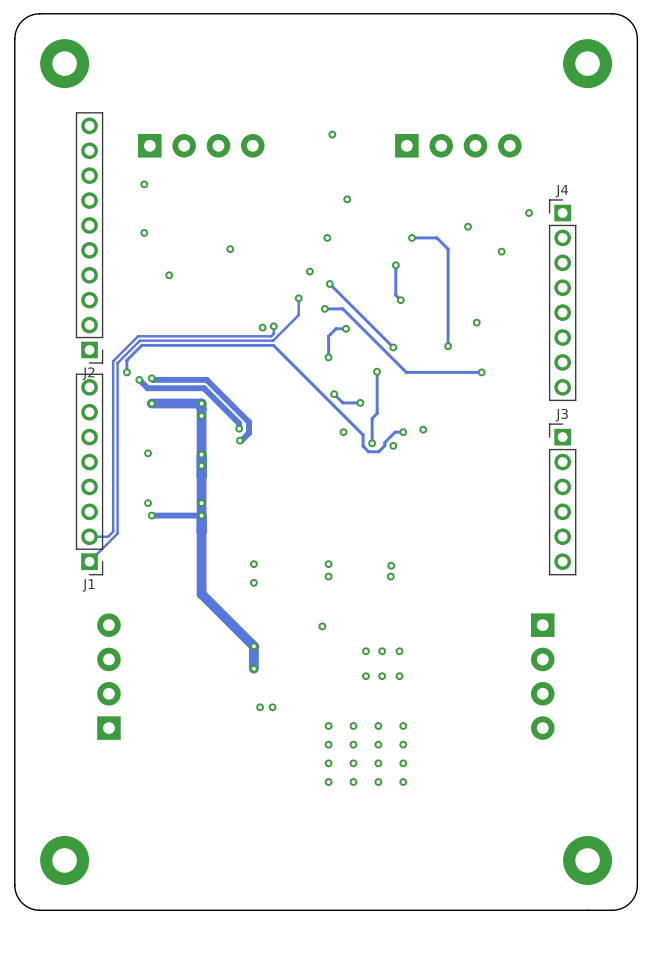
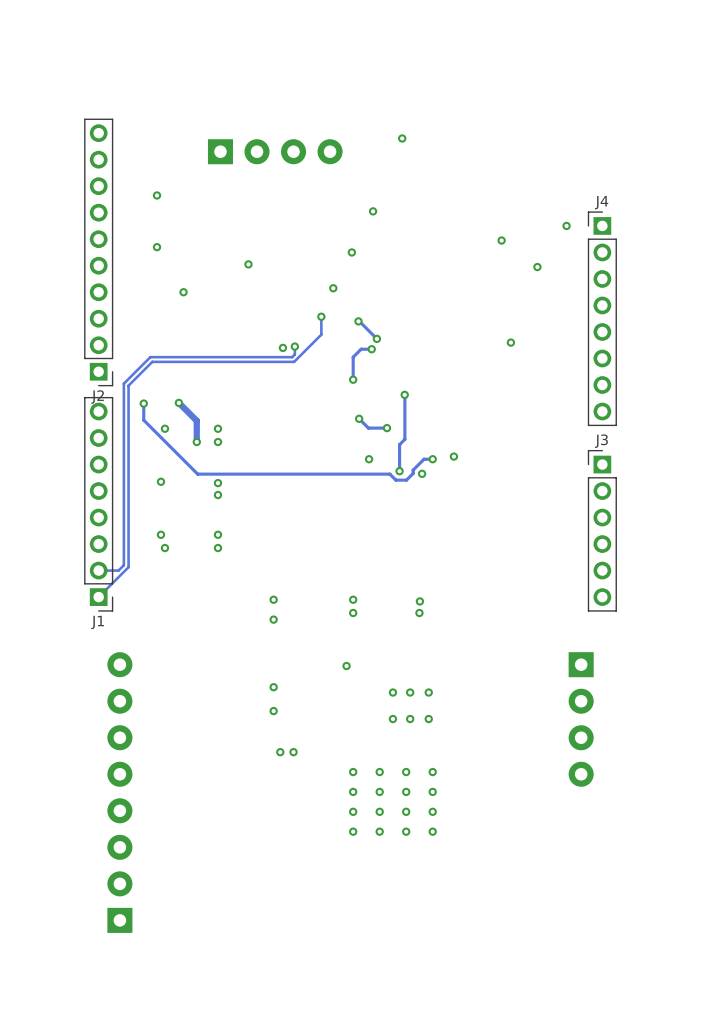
board edge: (612, 13) (39, 13) (27, 17) (18, 26) (14, 38) (14, 885) (18, 897) (27, 906) (39, 910) (612, 910) (624, 906) (634, 897) (637, 885) (637, 38) (635, 29) (630, 21) (621, 15) (612, 13) -> none
part: (64, 63) -> none
part: (587, 63) -> none
via position: (332, 134) -> (402, 138)
part position: (201, 145) -> (275, 151)
part: (458, 145) -> none
track: (412, 237) (436, 237) (448, 249) (448, 346) -> none
via: (412, 237) -> none
track: (395, 265) (395, 295) (400, 300) -> none
via: (395, 265) -> none
track: (329, 283) (393, 347) -> none
via: (329, 283) -> none
via: (400, 300) -> none
track: none -> (358, 321) (376, 338)
via: none -> (358, 321)
track: (324, 308) (342, 308) (406, 372) (481, 372) -> none
via: (324, 308) -> none
via: none -> (376, 338)
via: (448, 346) -> none
via: (393, 347) -> none
track: (126, 372) (126, 360) (141, 345) (273, 345) (363, 434) (363, 446) -> (143, 403) (143, 420) (197, 474) (389, 474)
via: (126, 372) -> none
via: (481, 372) -> none
track: (151, 378) (206, 379) (249, 422) (249, 432) (239, 440) -> none
via: (151, 378) -> none
via: none -> (143, 403)
track: (139, 379) (147, 388) (203, 388) (239, 423) (239, 428) -> none
via: (139, 379) -> none
track: none -> (178, 402) (196, 420) (196, 442)
via: none -> (178, 402)
track: (151, 403) (201, 403) (201, 594) (253, 646) (253, 668) -> none
via: none -> (196, 442)
via: (239, 428) -> none
via: (239, 440) -> none
track: (201, 515) (151, 515) -> none
part: (108, 676) -> none
part: none -> (119, 792)
part: (64, 860) -> none
part: (587, 860) -> none

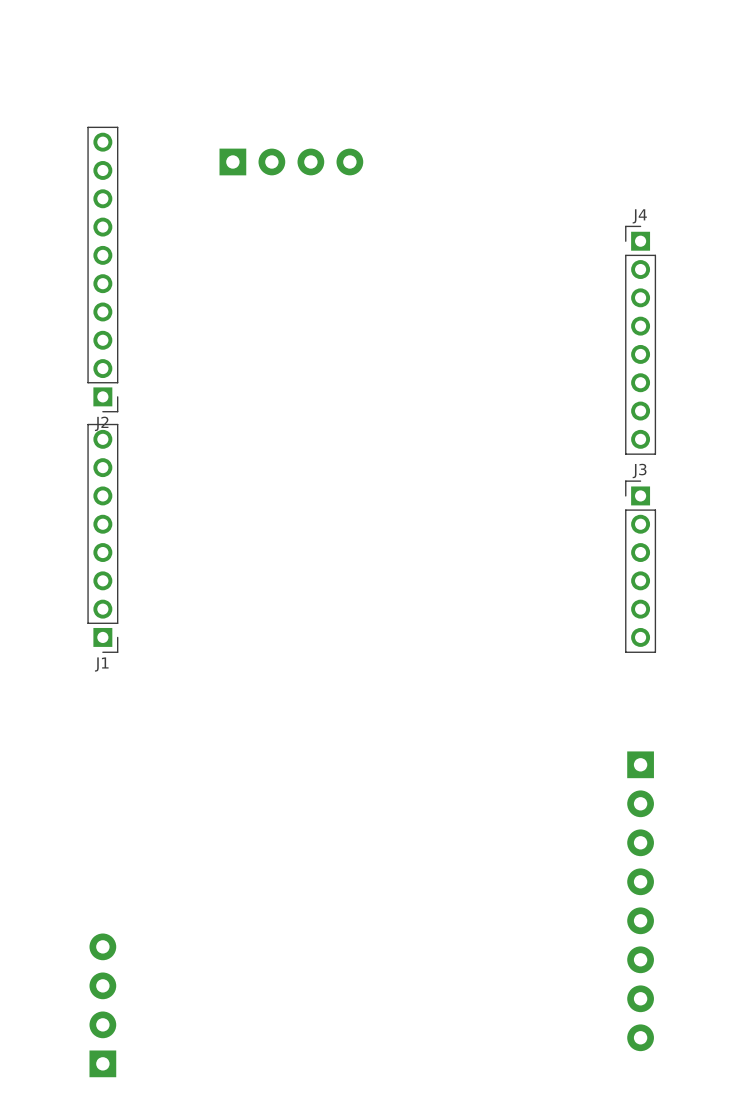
via: (402, 138) -> none
via: (157, 195) -> none
via: (373, 211) -> none
via: (566, 225) -> none
via: (501, 240) -> none
via: (157, 247) -> none
via: (351, 252) -> none
via: (248, 264) -> none
via: (537, 267) -> none
via: (333, 288) -> none
via: (183, 292) -> none
track: (321, 316) (321, 334) (294, 361) (152, 361) (128, 385) (128, 567) (98, 597) -> none
via: (321, 316) -> none
track: (358, 321) (376, 338) -> none
via: (358, 321) -> none
via: (376, 338) -> none
via: (510, 342) -> none
track: (294, 346) (294, 354) (292, 357) (150, 357) (123, 383) (123, 565) (118, 570) (98, 570) -> none
via: (294, 346) -> none
via: (282, 347) -> none
track: (371, 349) (361, 349) (353, 357) (353, 379) -> none
via: (371, 349) -> none
via: (353, 379) -> none
track: (404, 394) (404, 439) (399, 444) (399, 471) -> none
via: (404, 394) -> none
track: (178, 402) (196, 420) (196, 442) -> none
via: (178, 402) -> none
track: (143, 403) (143, 420) (197, 474) (389, 474) (395, 480) (406, 480) (424, 459) (432, 459) -> none
via: (143, 403) -> none
track: (359, 418) (368, 428) (386, 428) -> none
via: (359, 418) -> none
via: (164, 428) -> none
via: (217, 428) -> none
via: (386, 428) -> none
via: (196, 442) -> none
via: (217, 442) -> none
via: (453, 456) -> none
via: (369, 459) -> none
via: (432, 459) -> none
via: (399, 471) -> none
via: (422, 473) -> none
via: (160, 481) -> none
via: (217, 483) -> none
via: (217, 495) -> none
via: (160, 534) -> none
via: (217, 534) -> none
via: (164, 548) -> none
via: (217, 548) -> none
via: (273, 599) -> none
via: (353, 599) -> none
via: (419, 601) -> none
via: (353, 612) -> none
via: (419, 612) -> none
via: (273, 619) -> none
via: (346, 666) -> none
via: (273, 687) -> none
via: (392, 692) -> none
via: (410, 692) -> none
via: (428, 692) -> none
via: (273, 711) -> none
via: (392, 719) -> none
via: (410, 719) -> none
via: (428, 719) -> none
part: (581, 719) -> none
via: (280, 752) -> none
via: (293, 752) -> none
via: (353, 772) -> none
via: (379, 772) -> none
via: (406, 772) -> none
via: (432, 772) -> none
via: (353, 791) -> none
via: (379, 791) -> none
via: (406, 791) -> none
via: (432, 791) -> none
part: (119, 792) -> none
via: (353, 811) -> none
via: (379, 811) -> none
via: (406, 811) -> none
via: (432, 811) -> none
via: (353, 831) -> none
via: (379, 831) -> none
via: (406, 831) -> none
via: (432, 831) -> none
part: none -> (640, 901)
part: none -> (102, 1005)

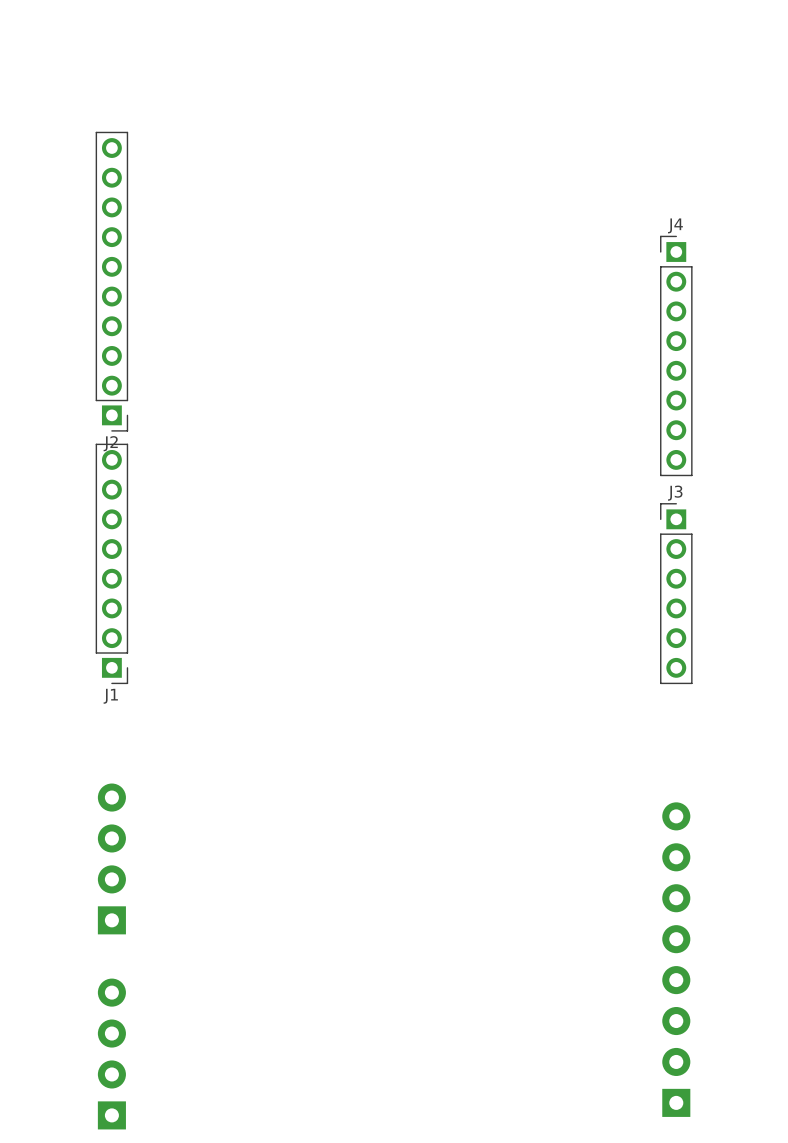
part: (291, 161) -> none
part: none -> (111, 858)
part rotation: 0° (640, 901) -> 180° (676, 959)

